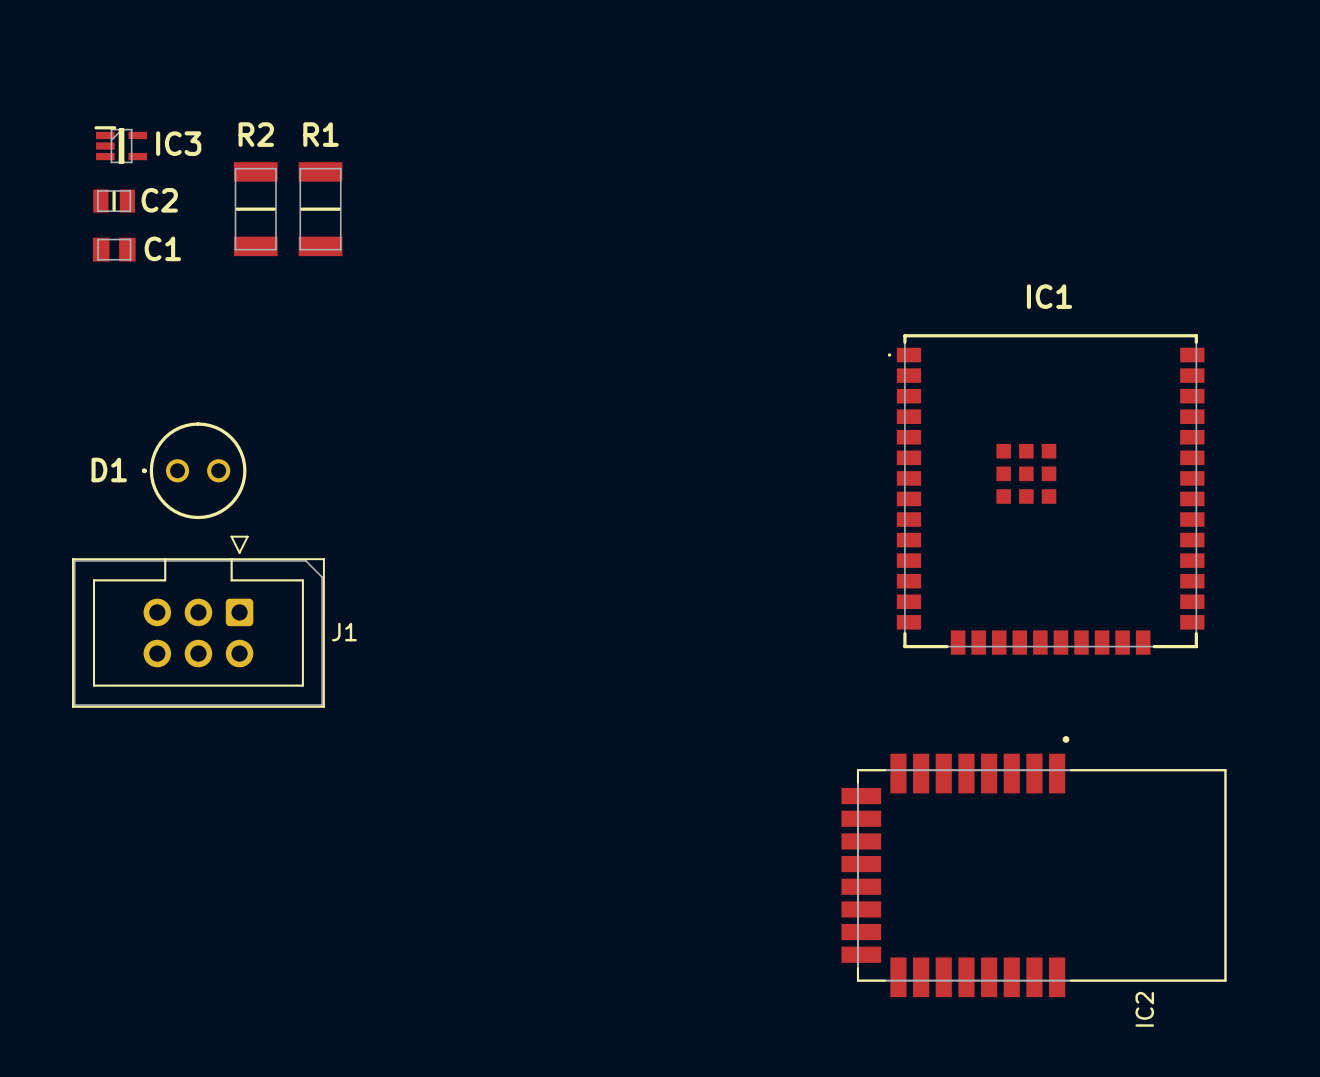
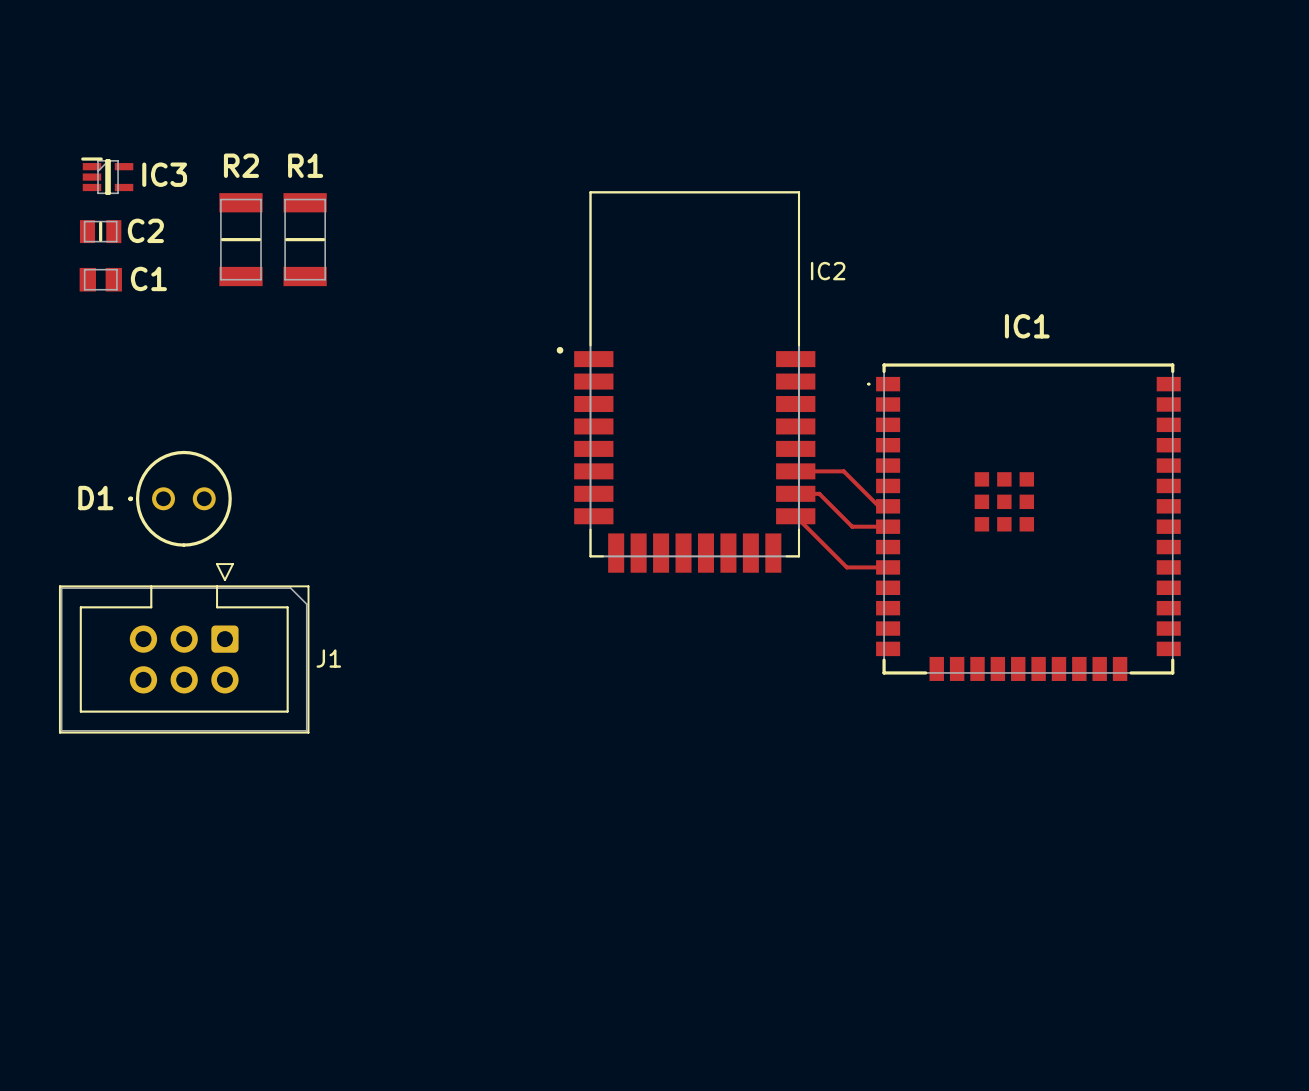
top track: none -> (795, 471) (843, 471) (878, 506) (888, 506)
top track: none -> (795, 493) (819, 493) (852, 526) (888, 526)
top track: none -> (795, 516) (846, 567) (888, 567)
IC2 rotation: 0° (1033, 866) -> 90° counterclockwise (686, 382)
IC2 position: (1033, 866) -> (686, 382)

